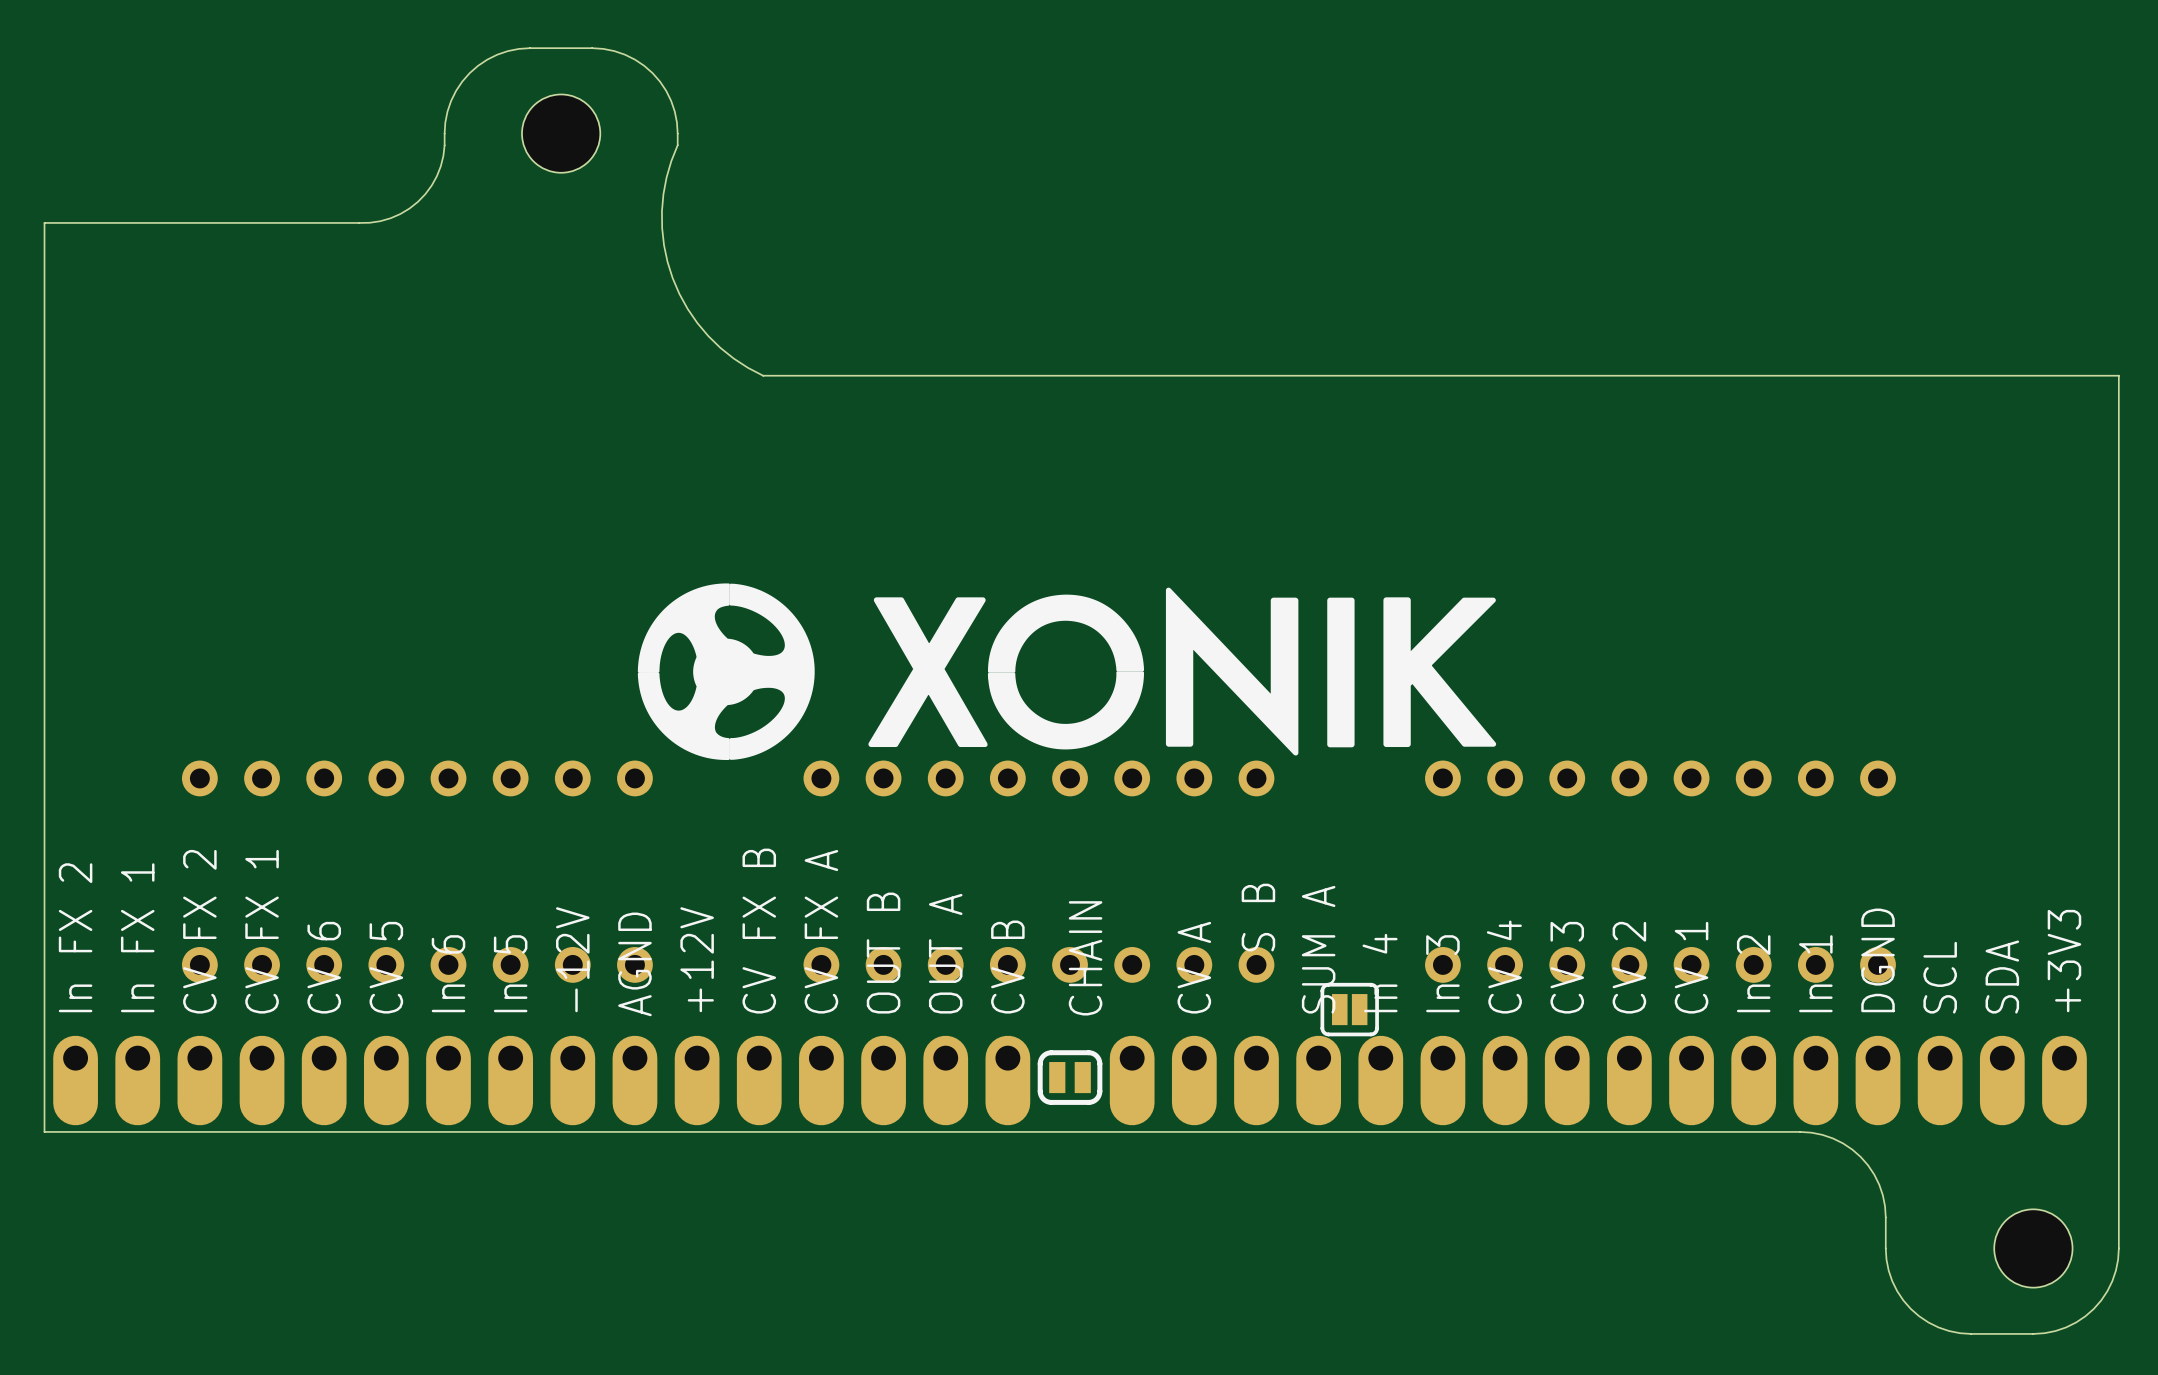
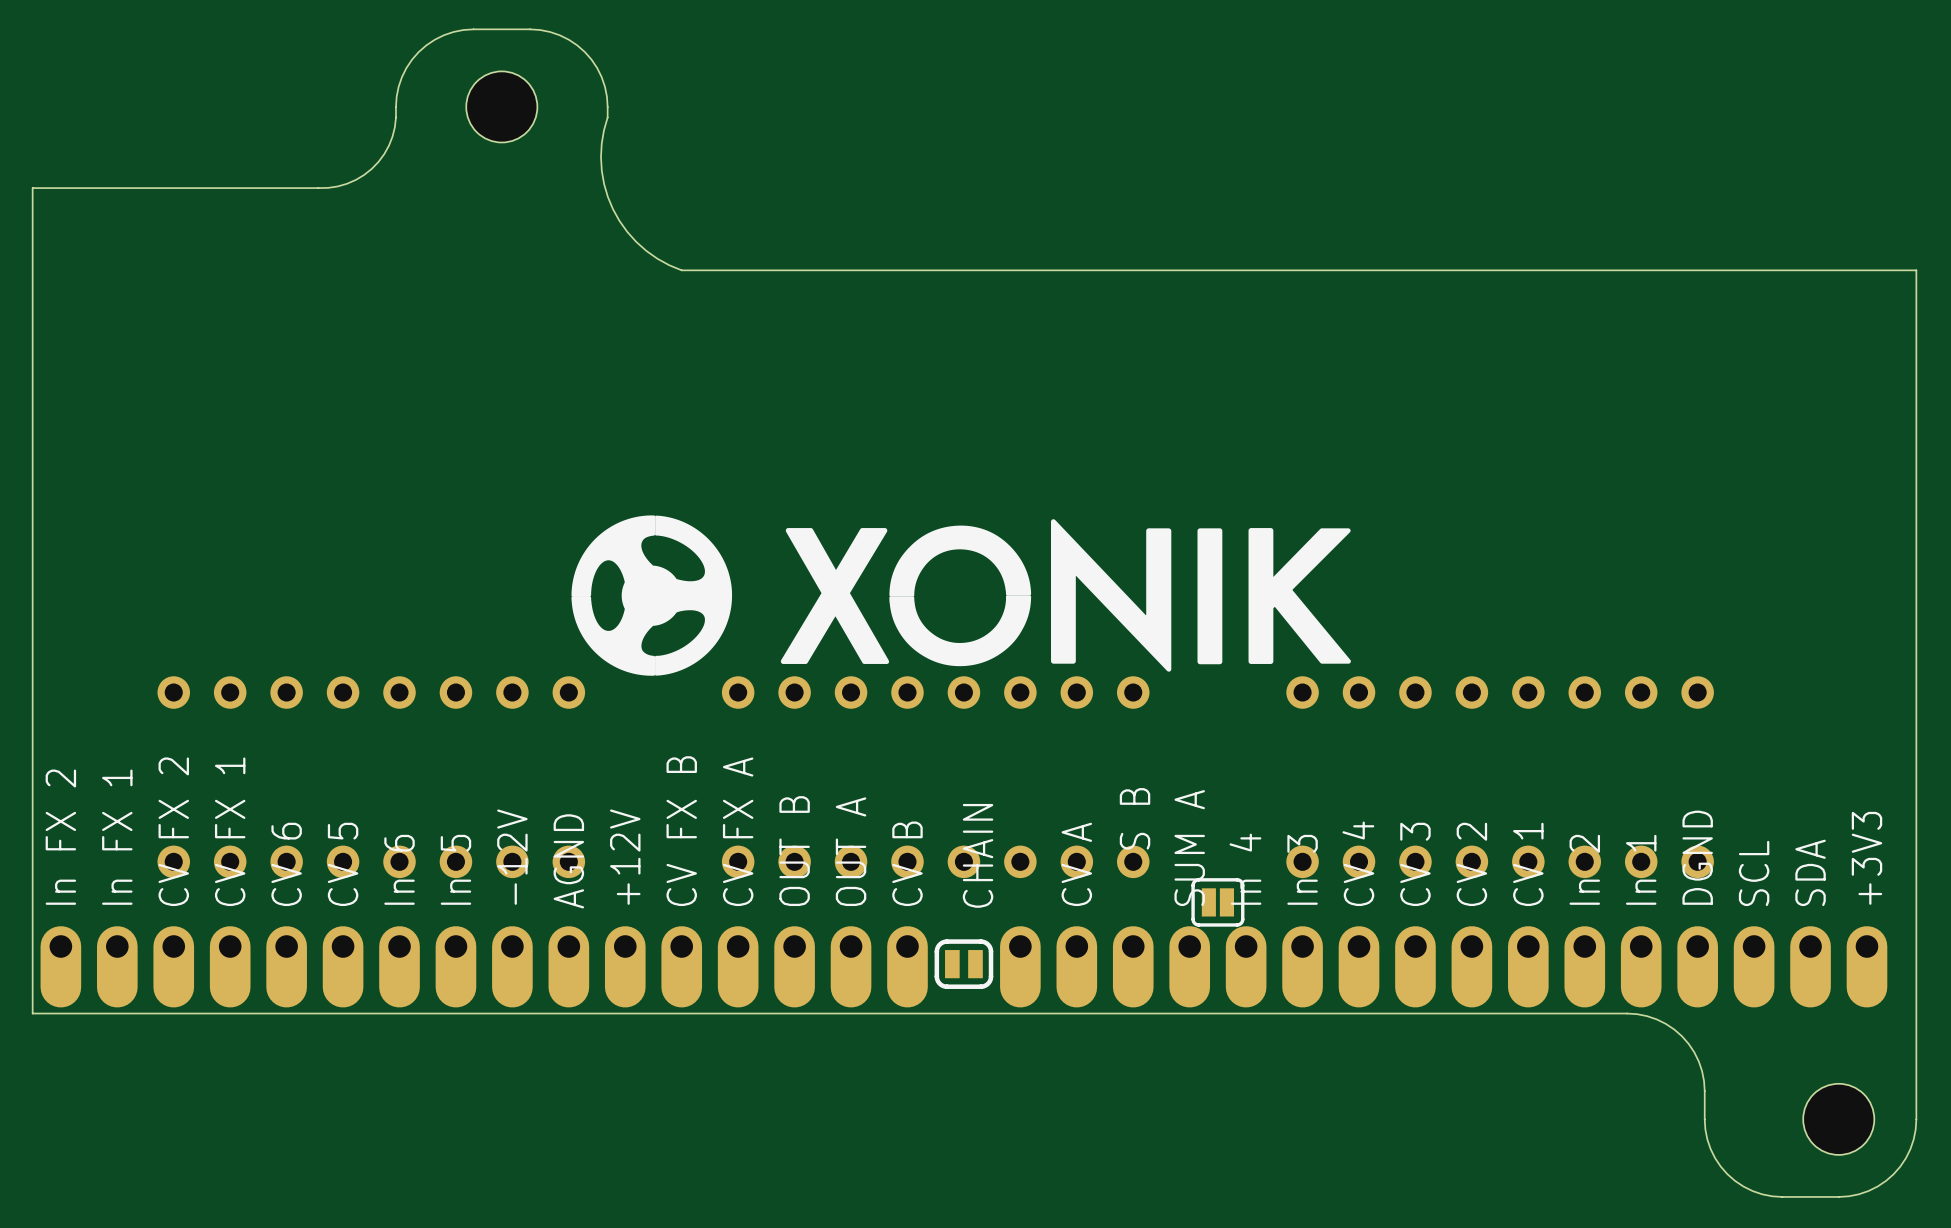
board edge: (677, 145) (666, 177) (661, 211) (664, 245) (672, 278) (687, 308) (708, 335) (733, 358) (763, 375) (2118, 375) -> (607, 117) (601, 143) (601, 157) (604, 183) (613, 209) (627, 232) (636, 242) (657, 258) (681, 270) (1916, 270) (1916, 326)

